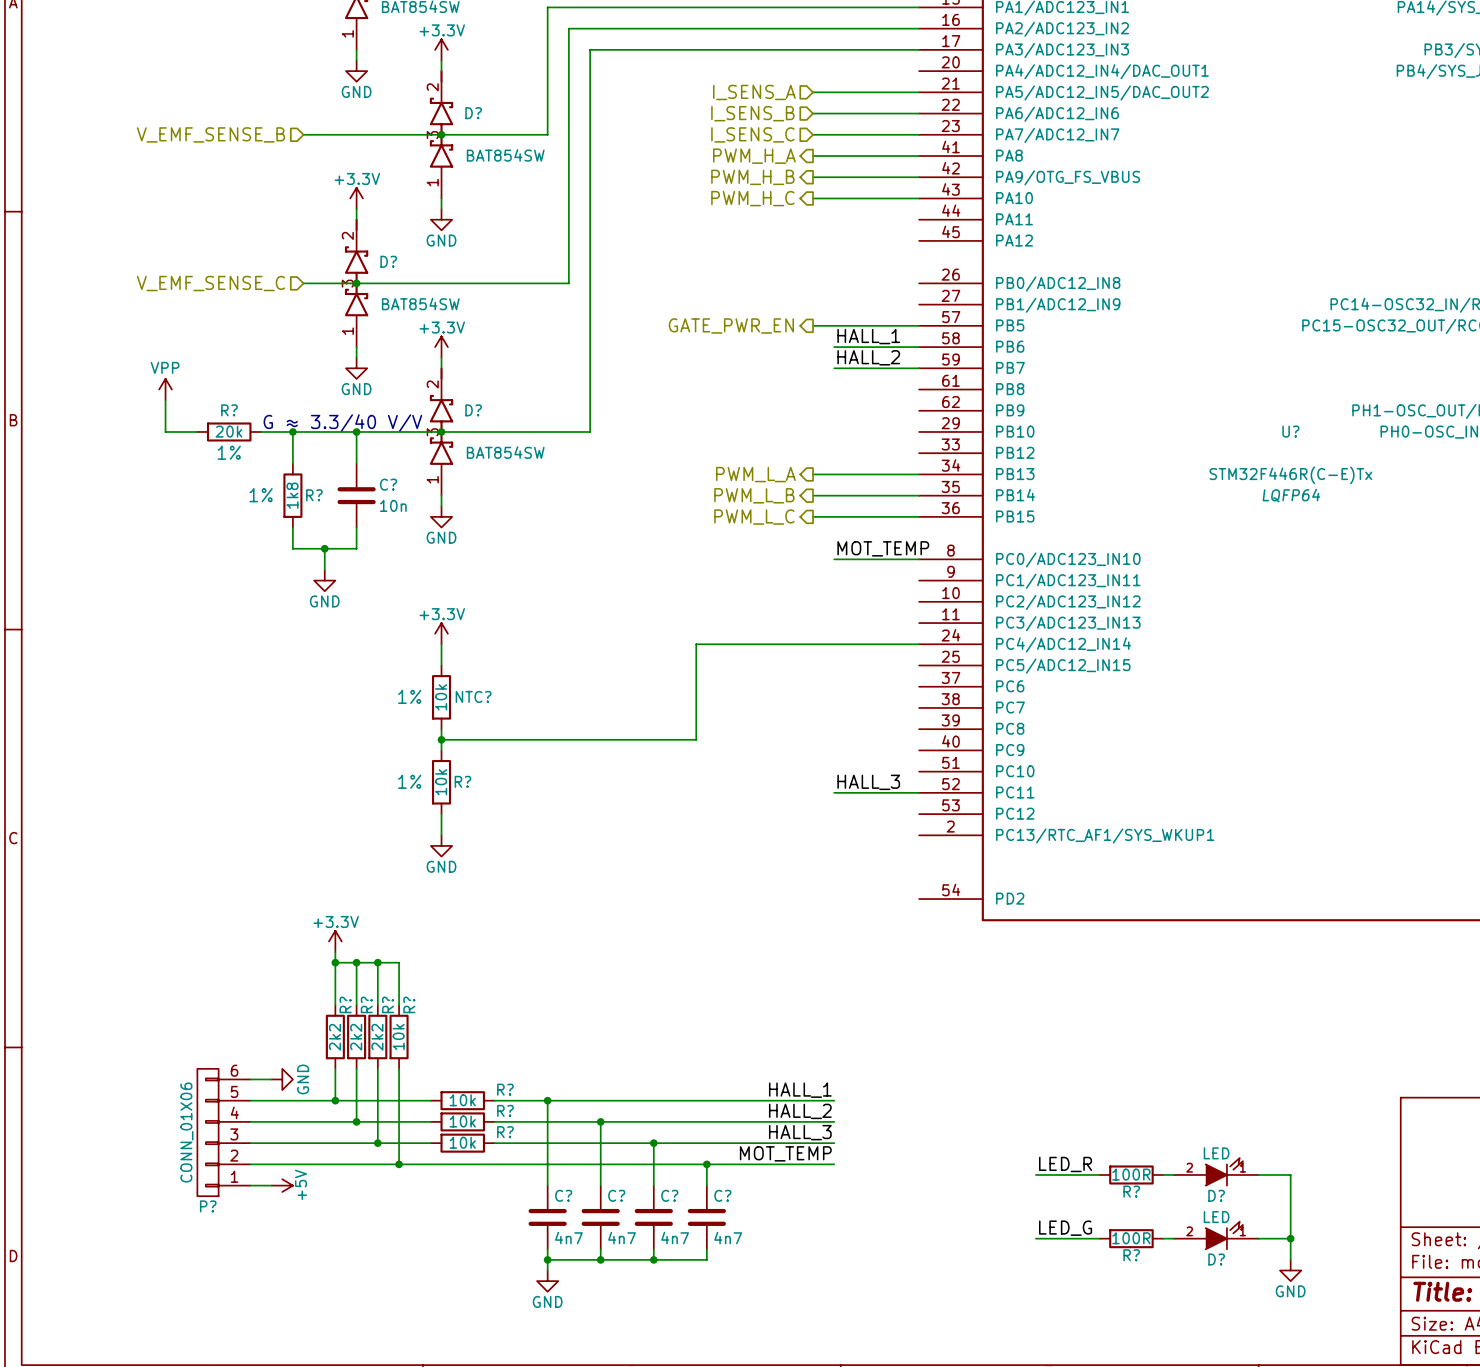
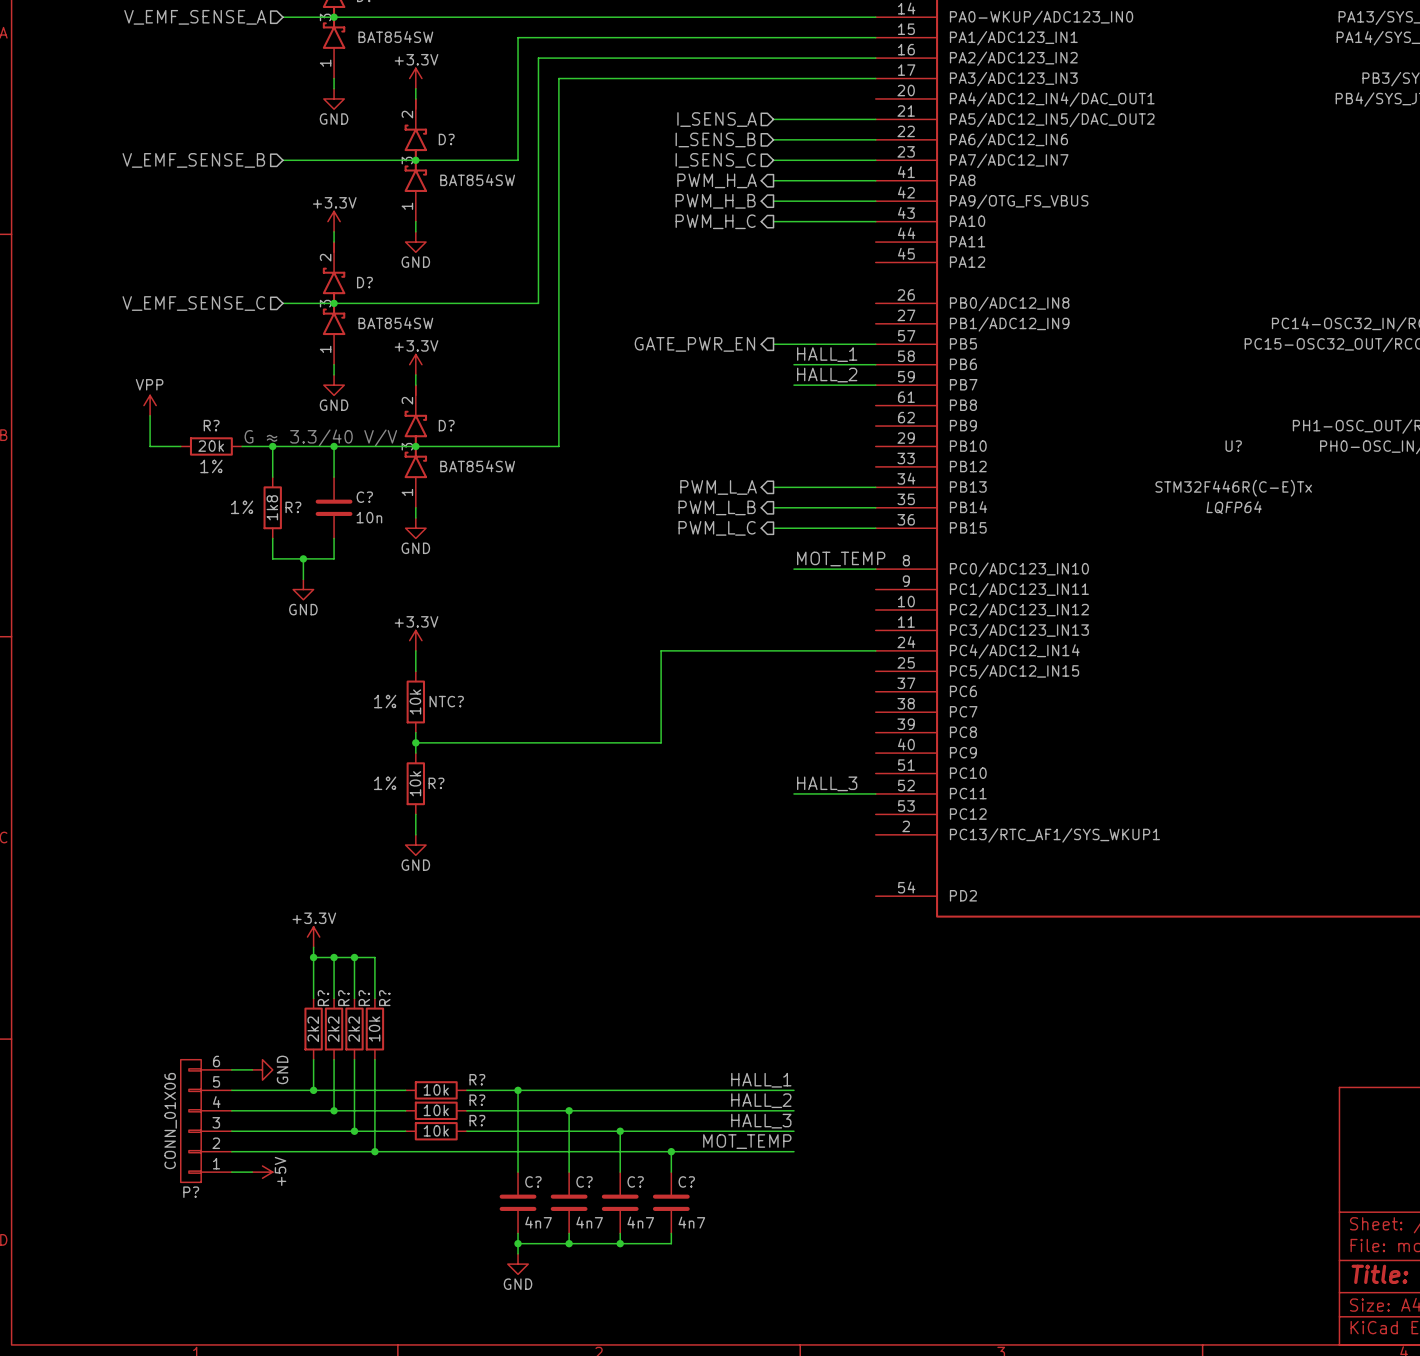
label: LED_R (1065, 1164) -> none
D?: LED (1216, 1171) -> none
wire: (1035, 1174) (1099, 1174) -> none
R?: 100R (1131, 1174) -> none
wire: (1163, 1174) (1173, 1174) -> none
wire: (1258, 1174) (1290, 1174) (1290, 1259) -> none
label: LED_G (1065, 1228) -> none
D?: LED (1216, 1235) -> none
wire: (1035, 1238) (1099, 1238) -> none
R?: 100R (1131, 1238) -> none
wire: (1163, 1238) (1173, 1238) -> none
wire: (1258, 1238) (1290, 1238) -> none
junction: (1290, 1238) -> none
power symbol: GND (1290, 1270) -> none

